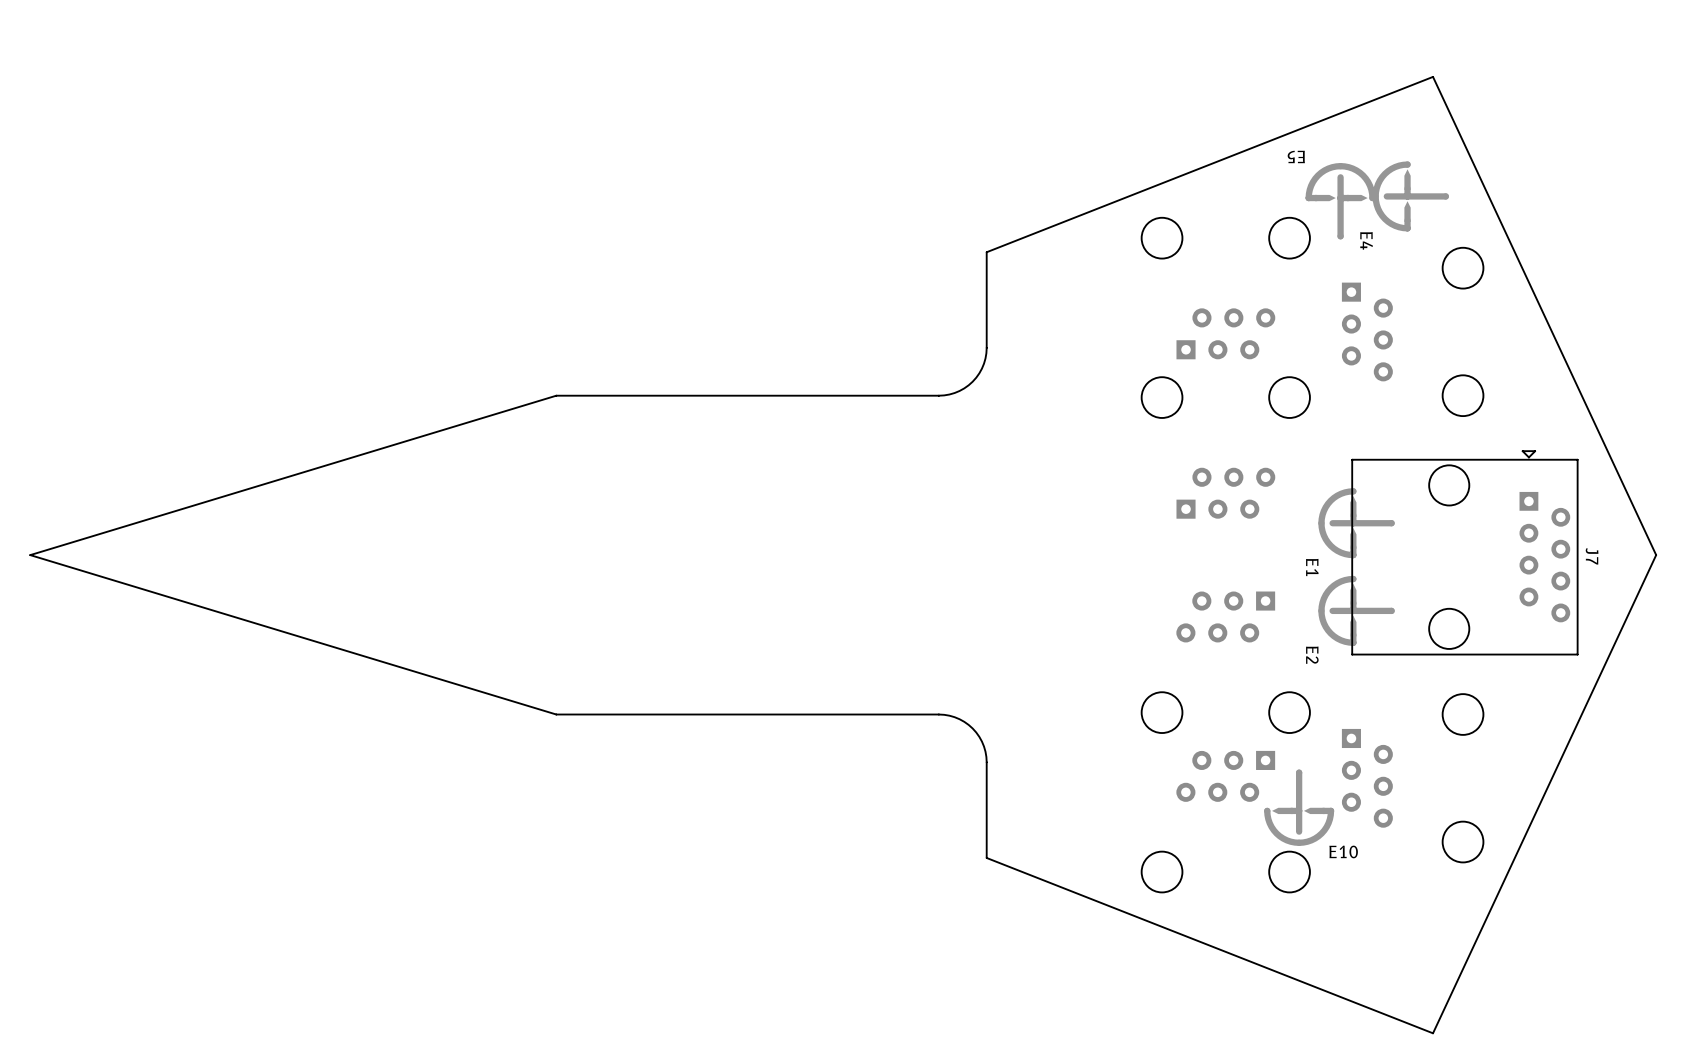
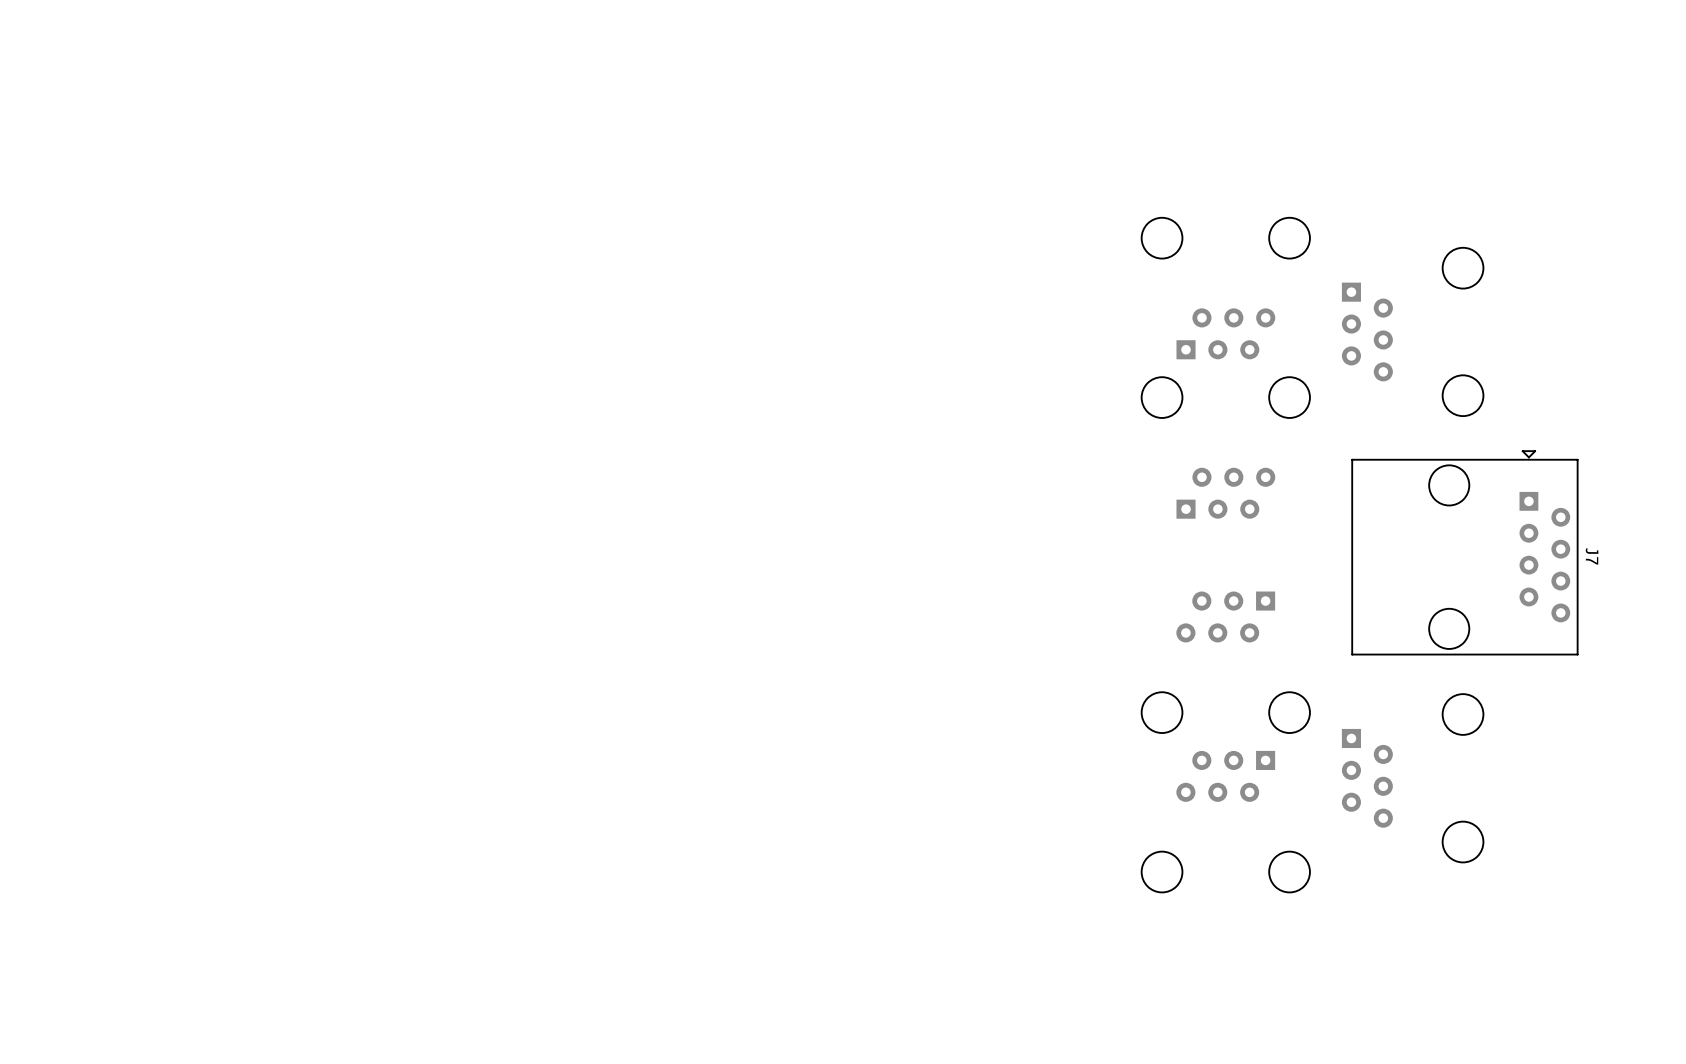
board edge: (1433, 76) (986, 252) (985, 358) (976, 377) (964, 388) (954, 393) (938, 395) (556, 395) (30, 555) (556, 714) (938, 714) (954, 717) (972, 728) (981, 741) (985, 751) (986, 857) (1433, 1033) (1656, 555) (1433, 76) -> none
E4: (1410, 196) -> none
E5: (1340, 201) -> none
E1: (1356, 523) -> none
E2: (1356, 610) -> none
E10: (1299, 807) -> none

